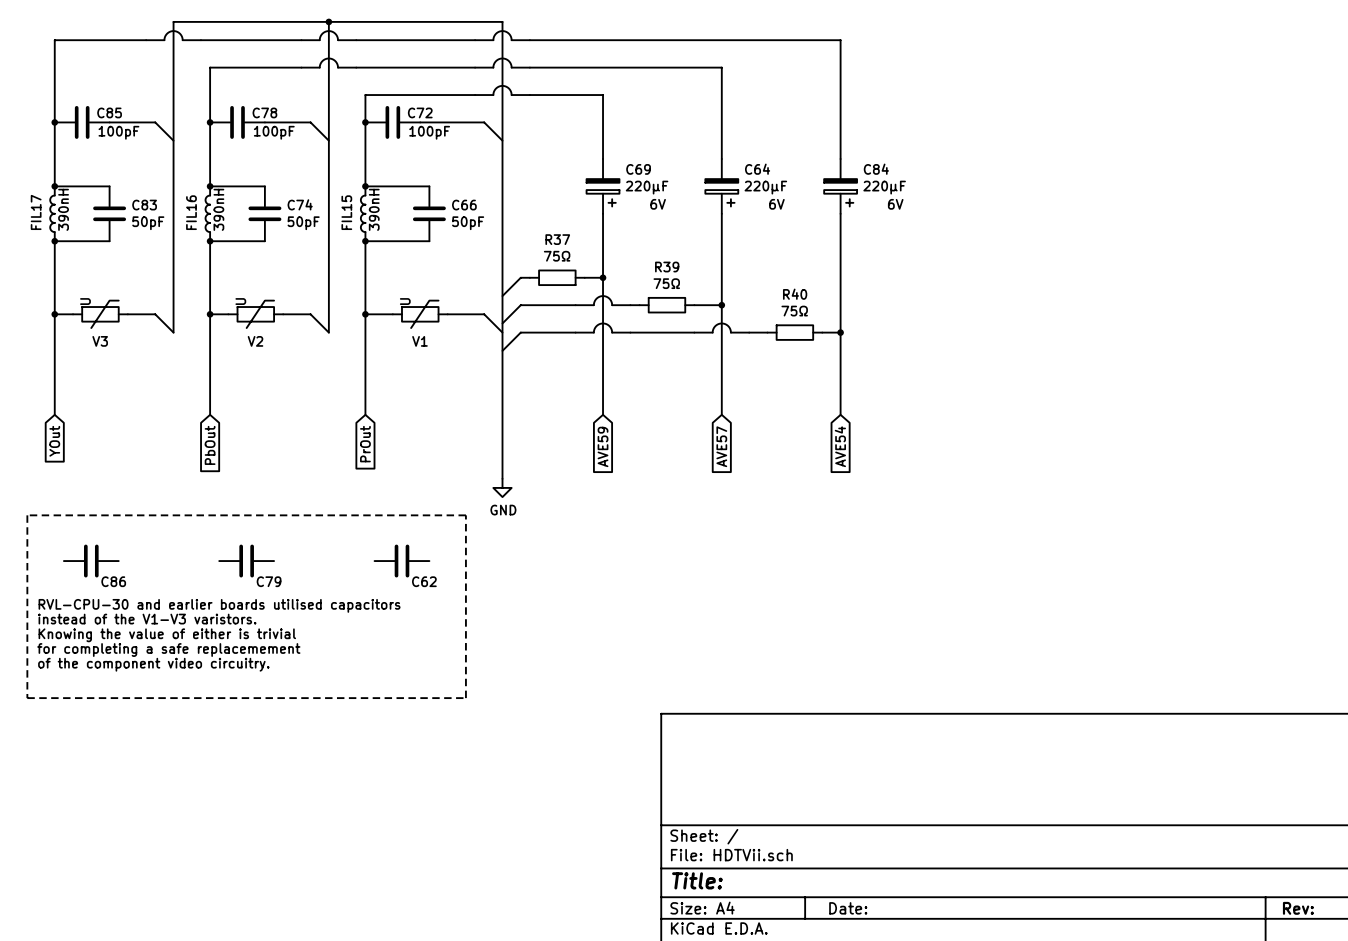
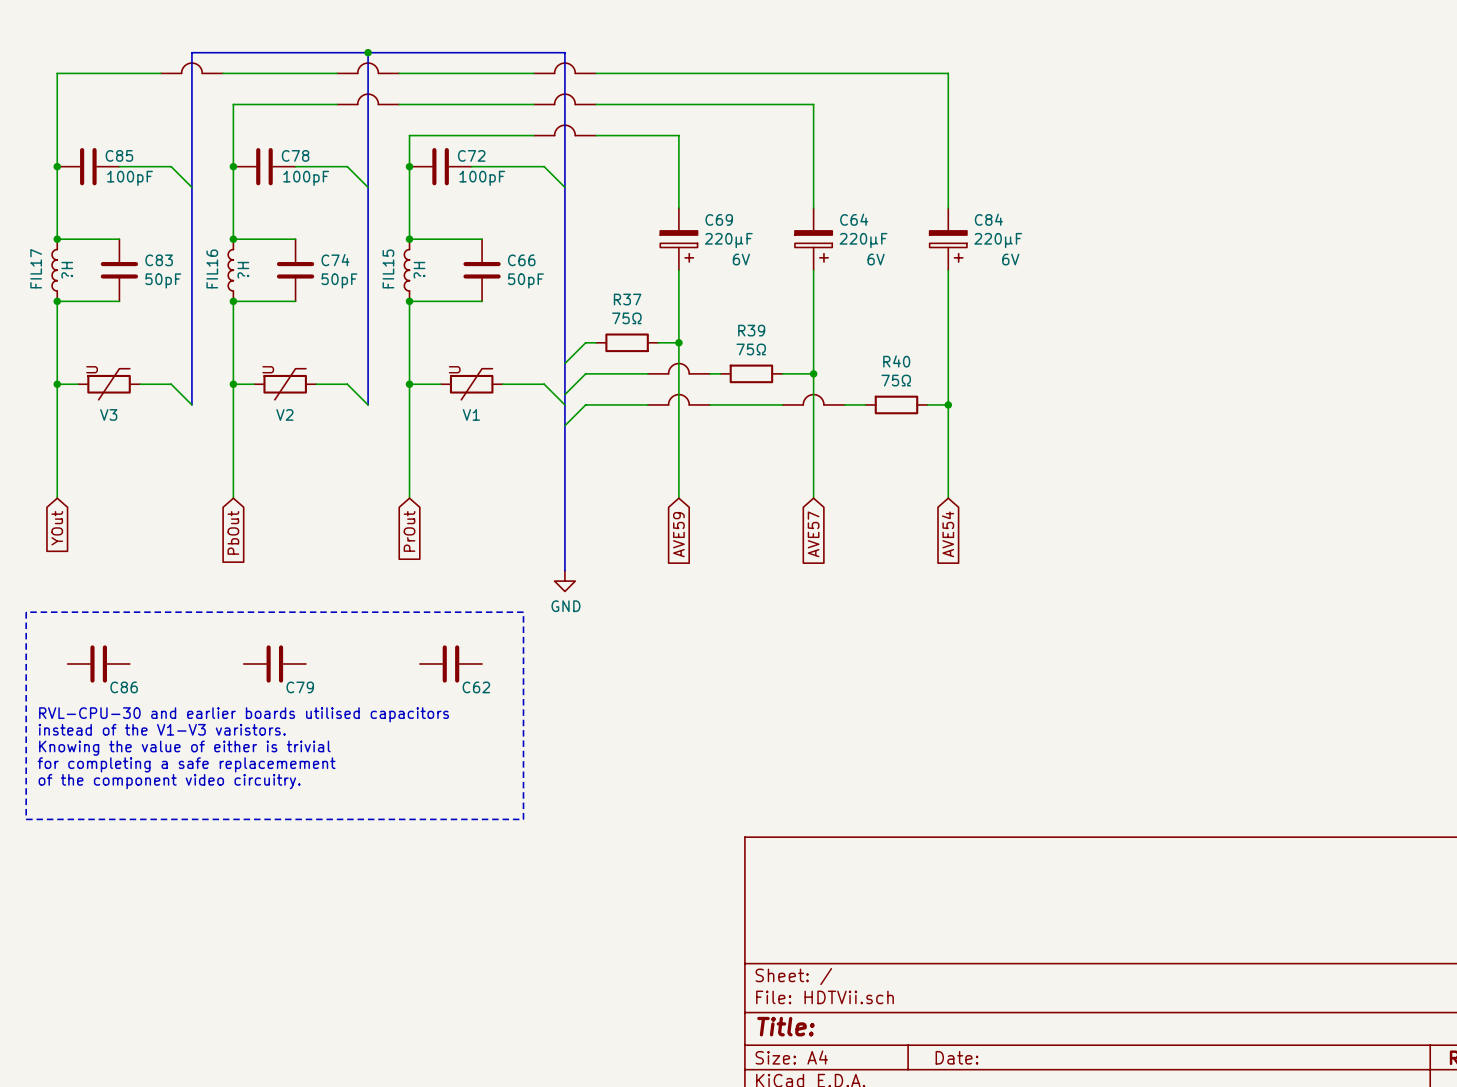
FIL17 value: 390nH (63, 209) -> ?H (67, 270)
FIL16 value: 390nH (218, 209) -> ?H (243, 270)
FIL15 value: 390nH (374, 209) -> ?H (419, 270)

